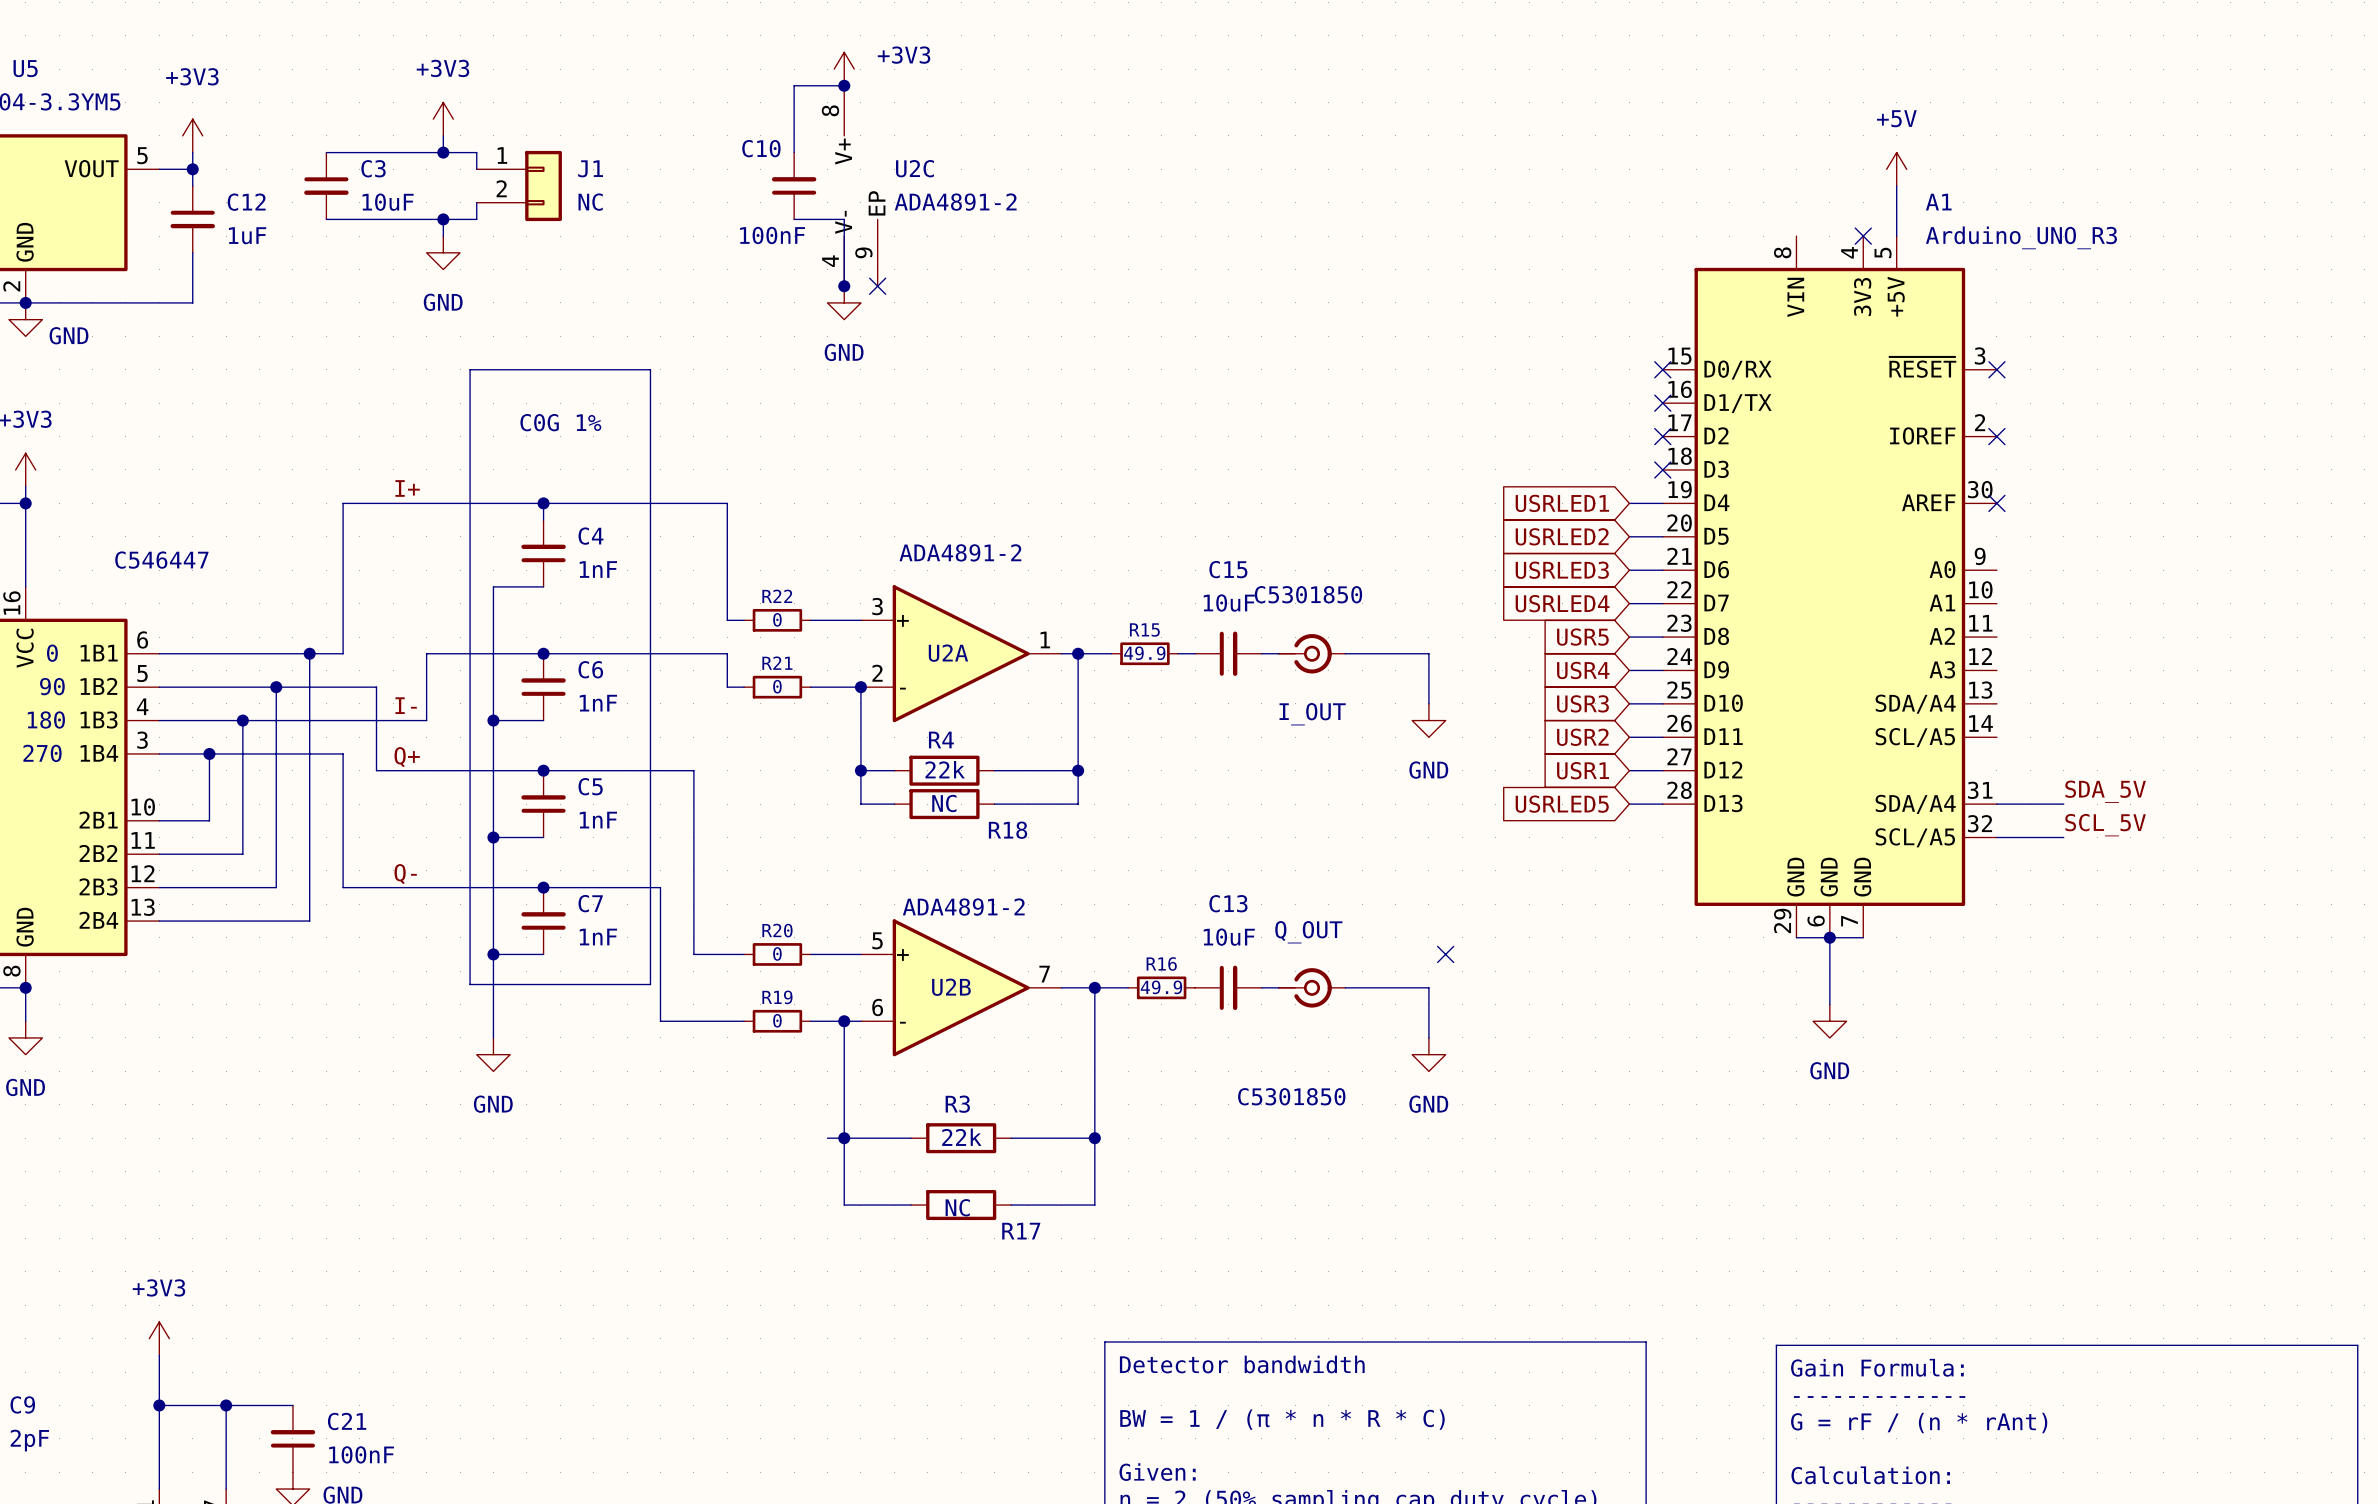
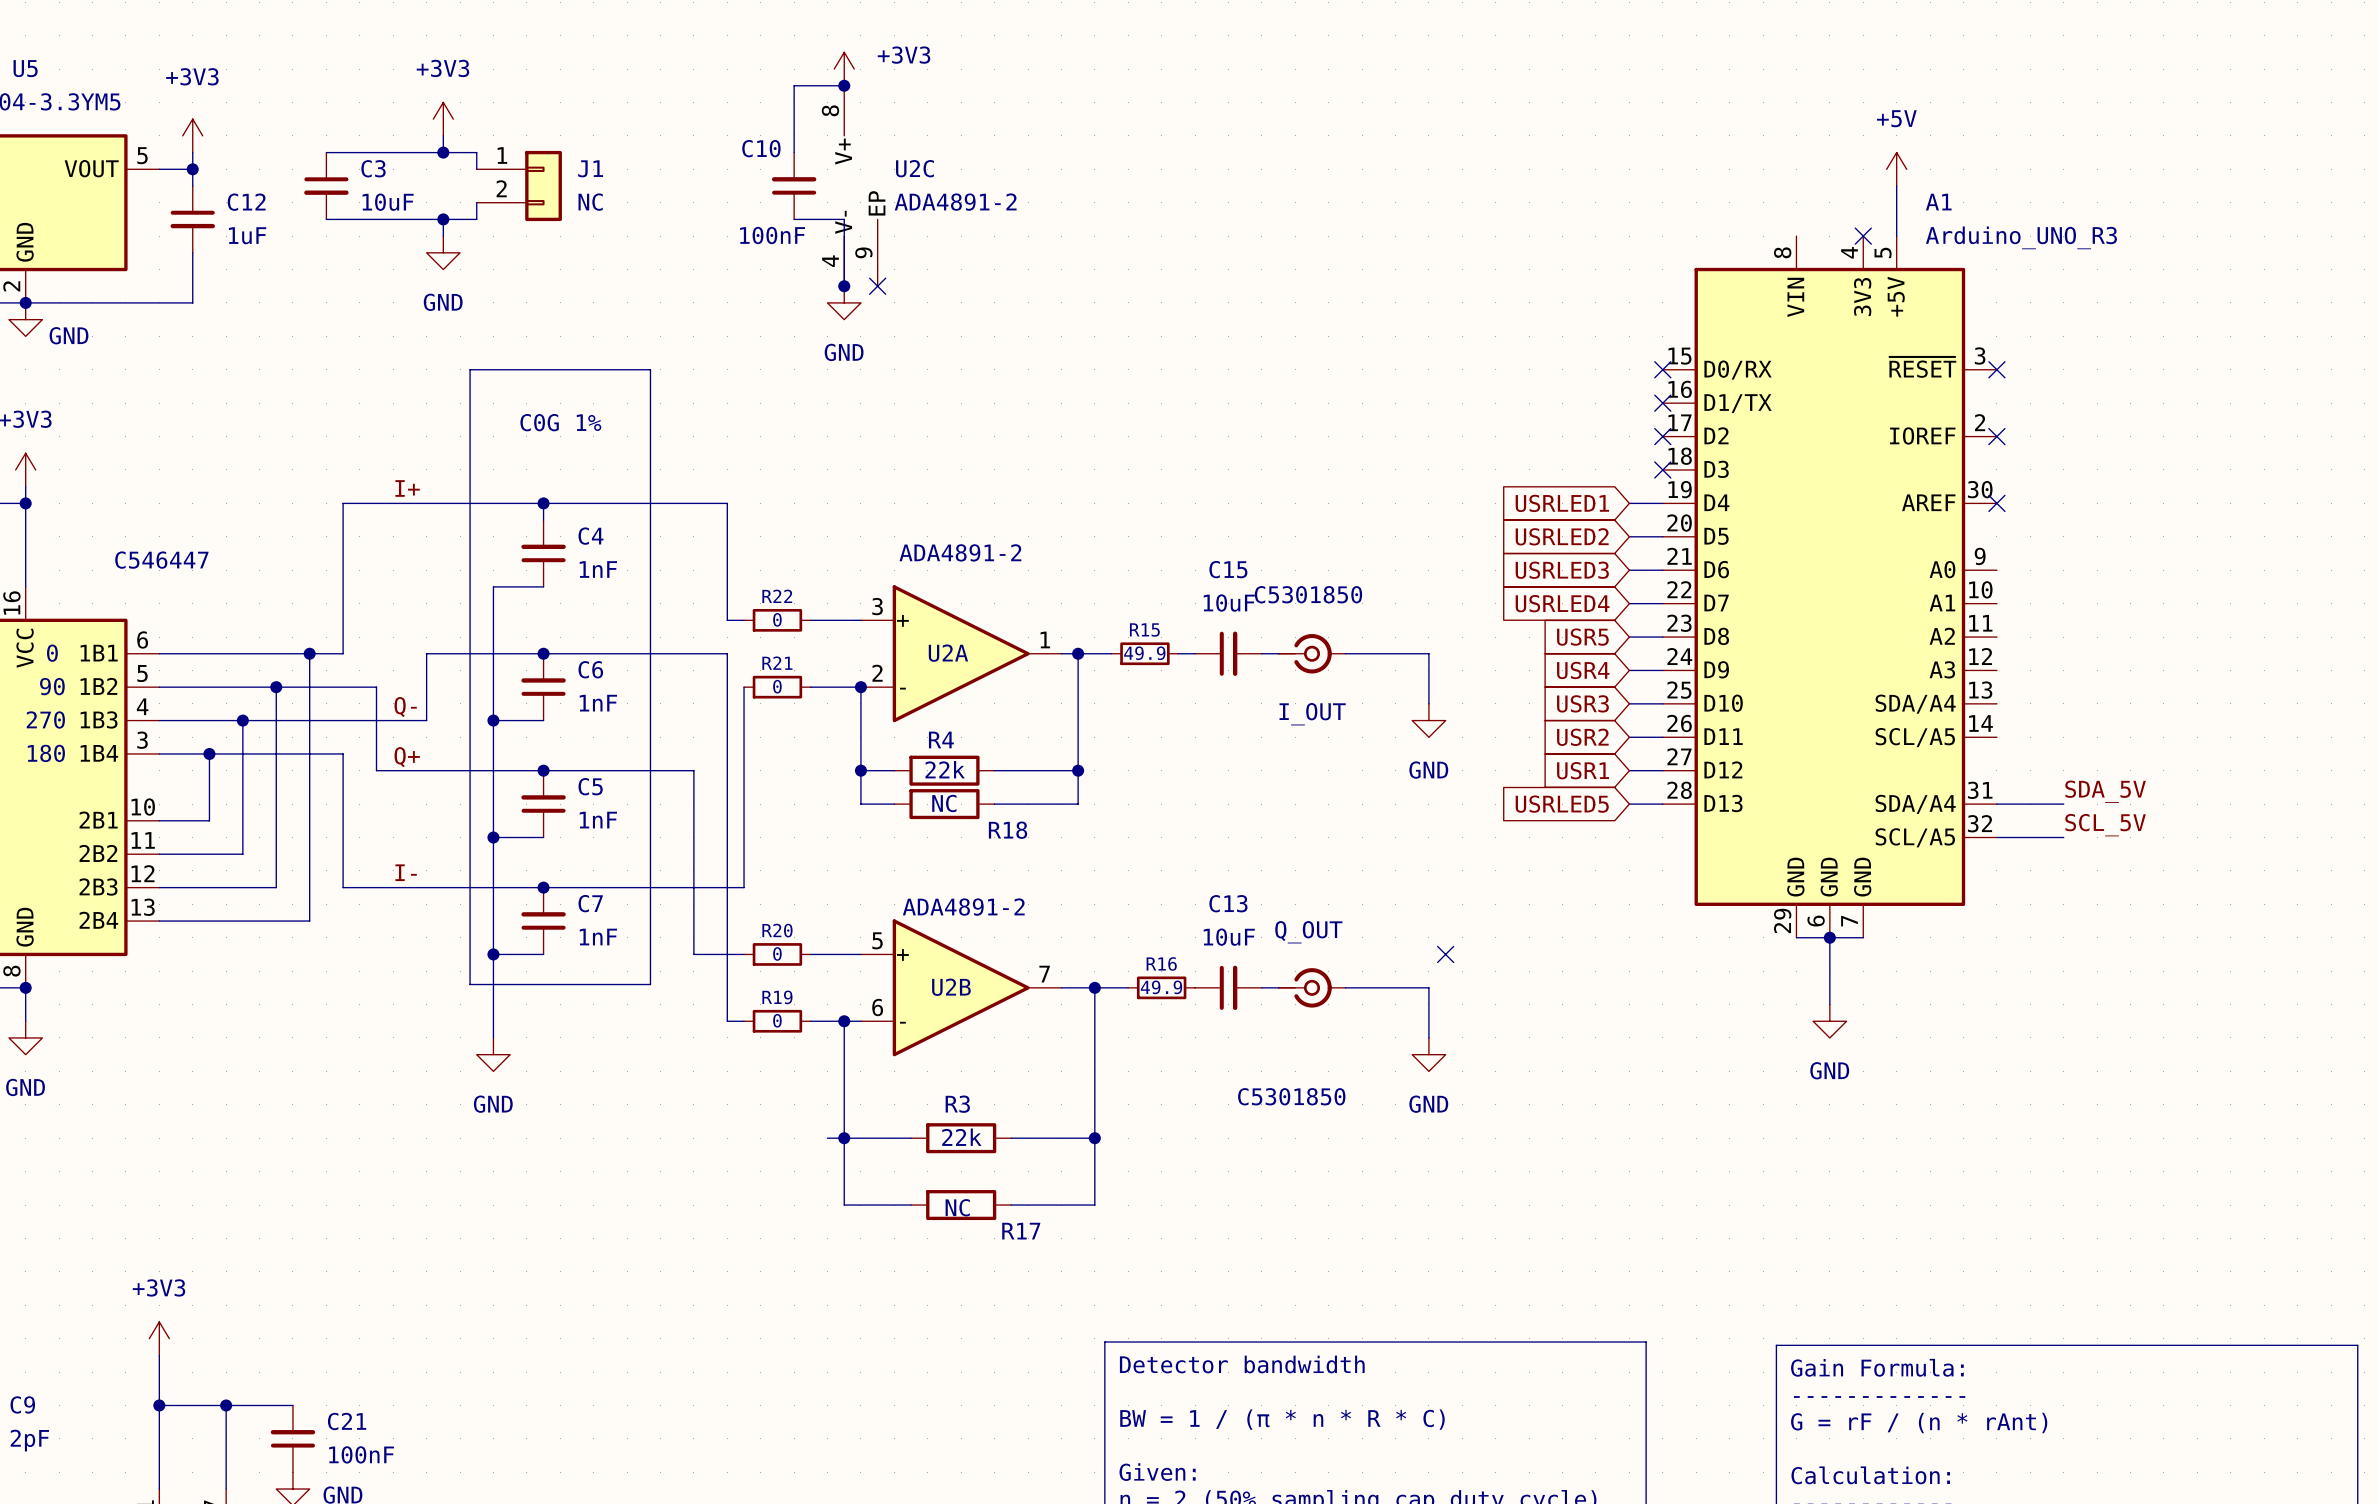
wire: (727, 687) (744, 687) -> (660, 887) (744, 887) (744, 687)
label: I- (406, 705) -> Q- (405, 707)
text: 180 (46, 720) -> 270 (45, 720)
text: 270 (42, 753) -> 180 (46, 753)
label: Q- (405, 874) -> I- (406, 872)
wire: (660, 887) (660, 1021) (727, 1021) -> (727, 687) (727, 1021)

